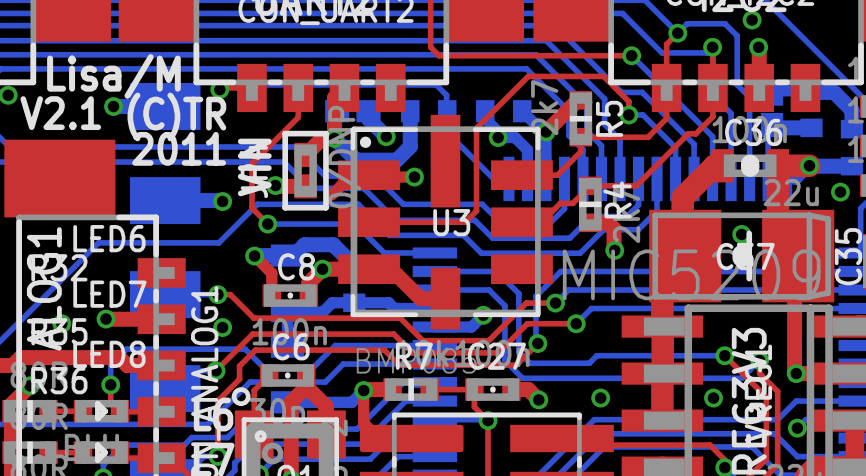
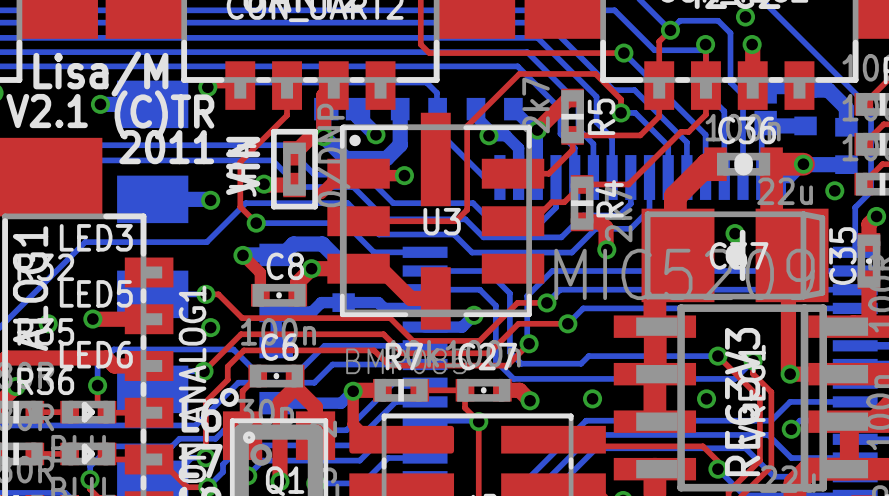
LED6 name: LED6 (109, 238) -> LED3 (96, 237)
LED7 name: LED7 (109, 294) -> LED5 (96, 293)
LED8 name: LED8 (109, 354) -> LED6 (96, 354)

